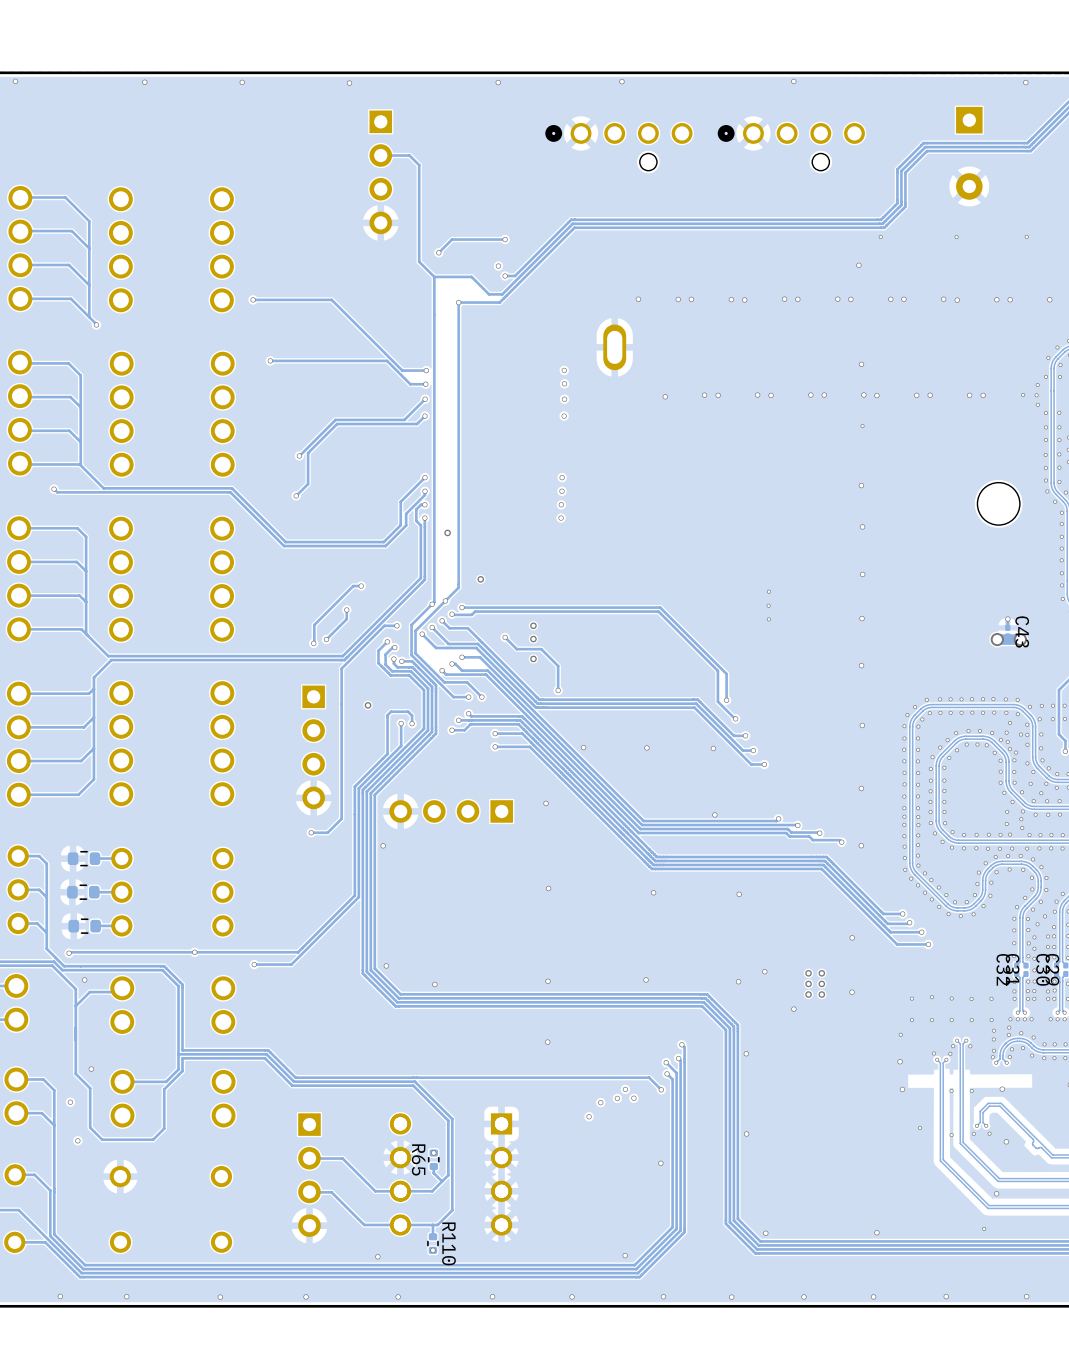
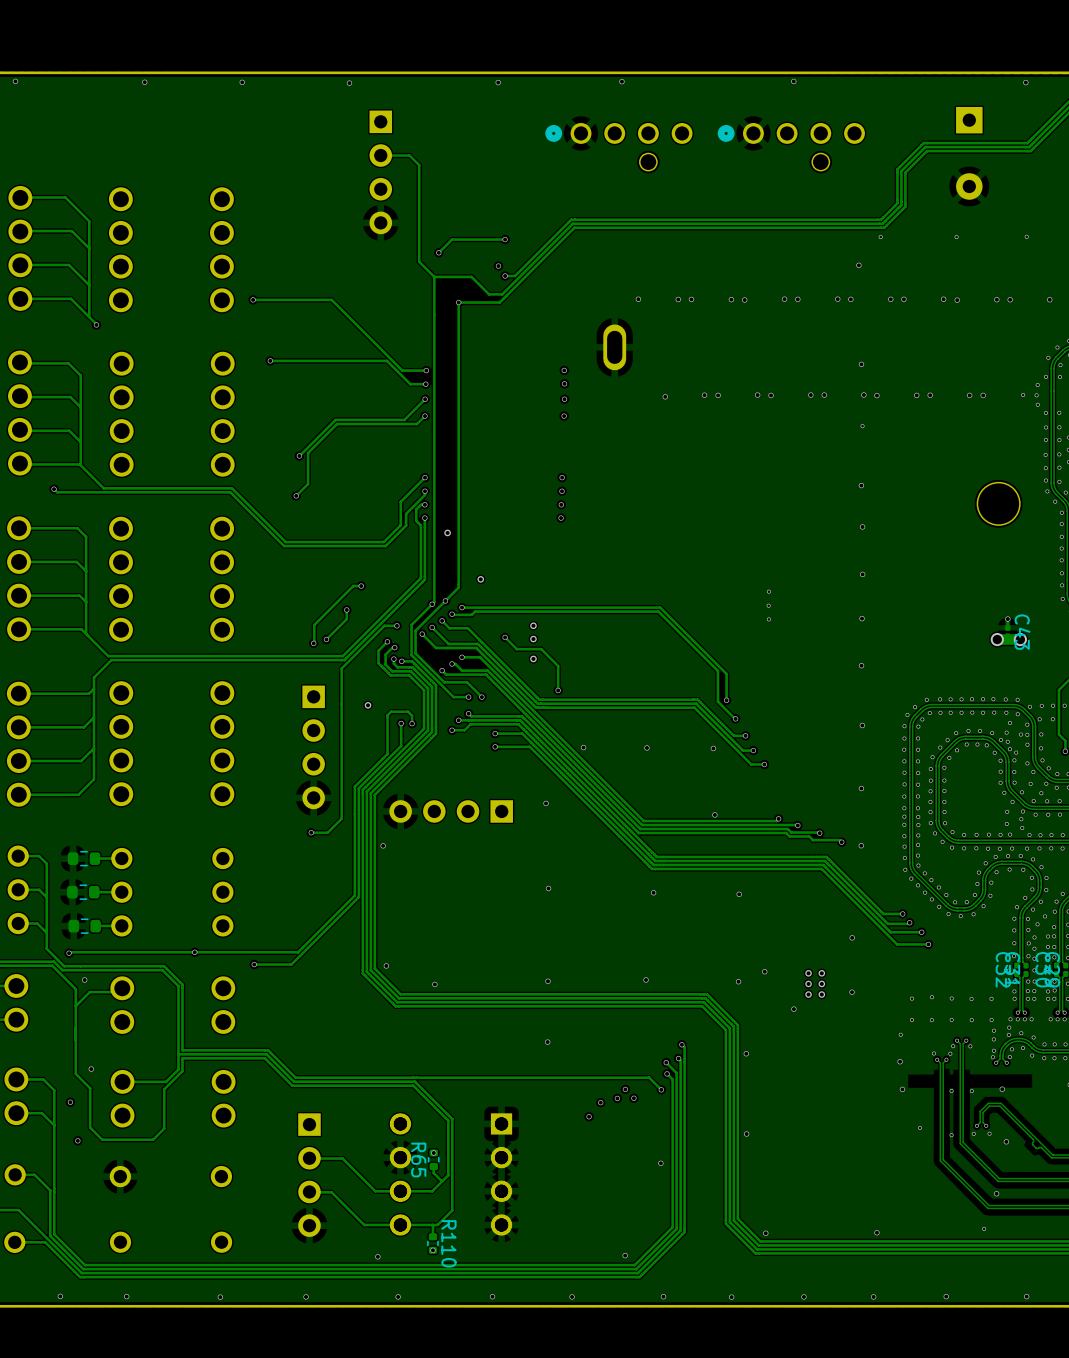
via: (1064, 719) -> none

